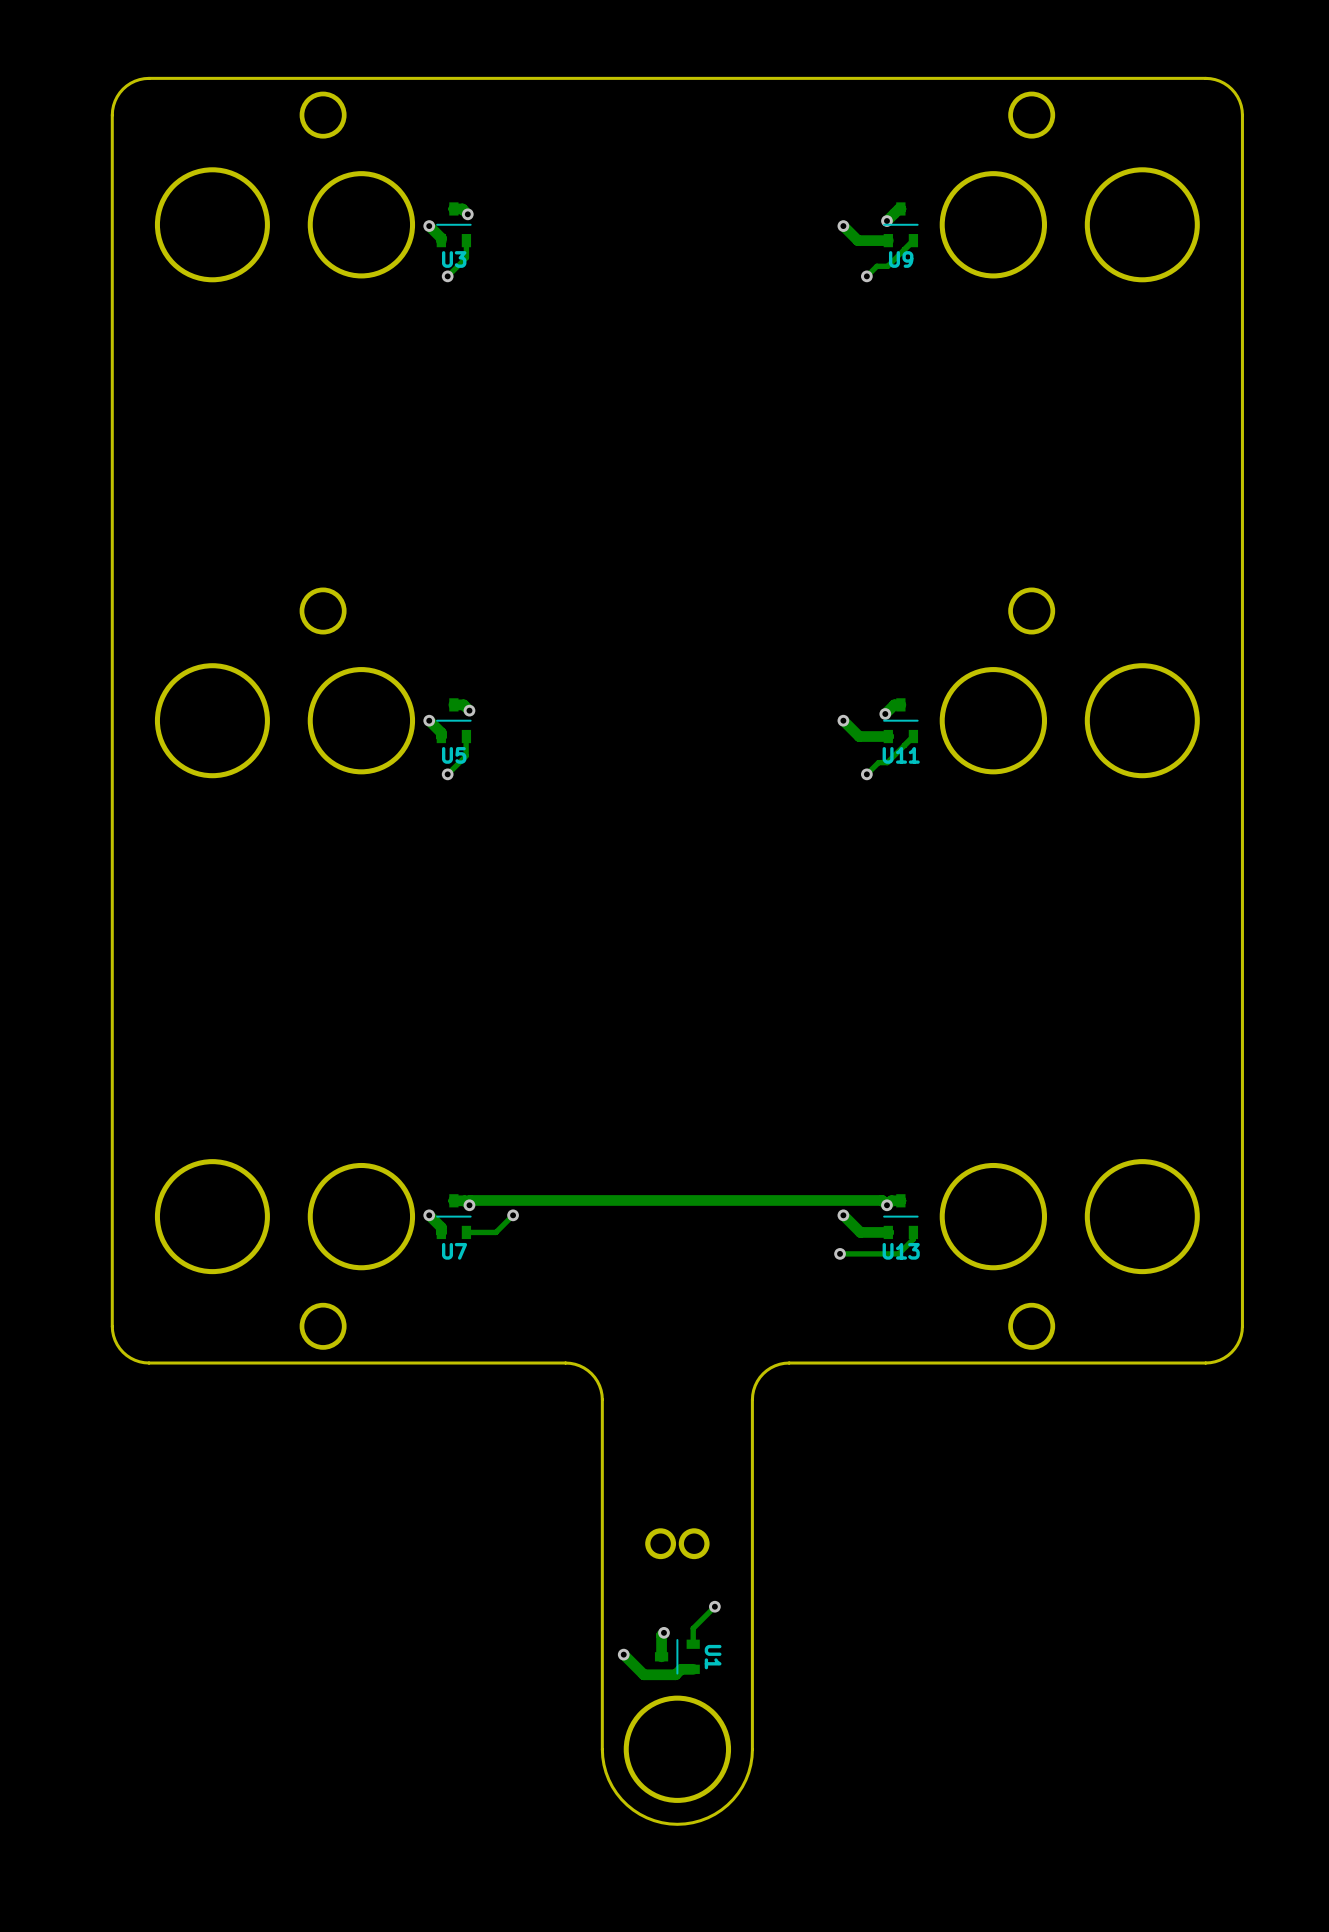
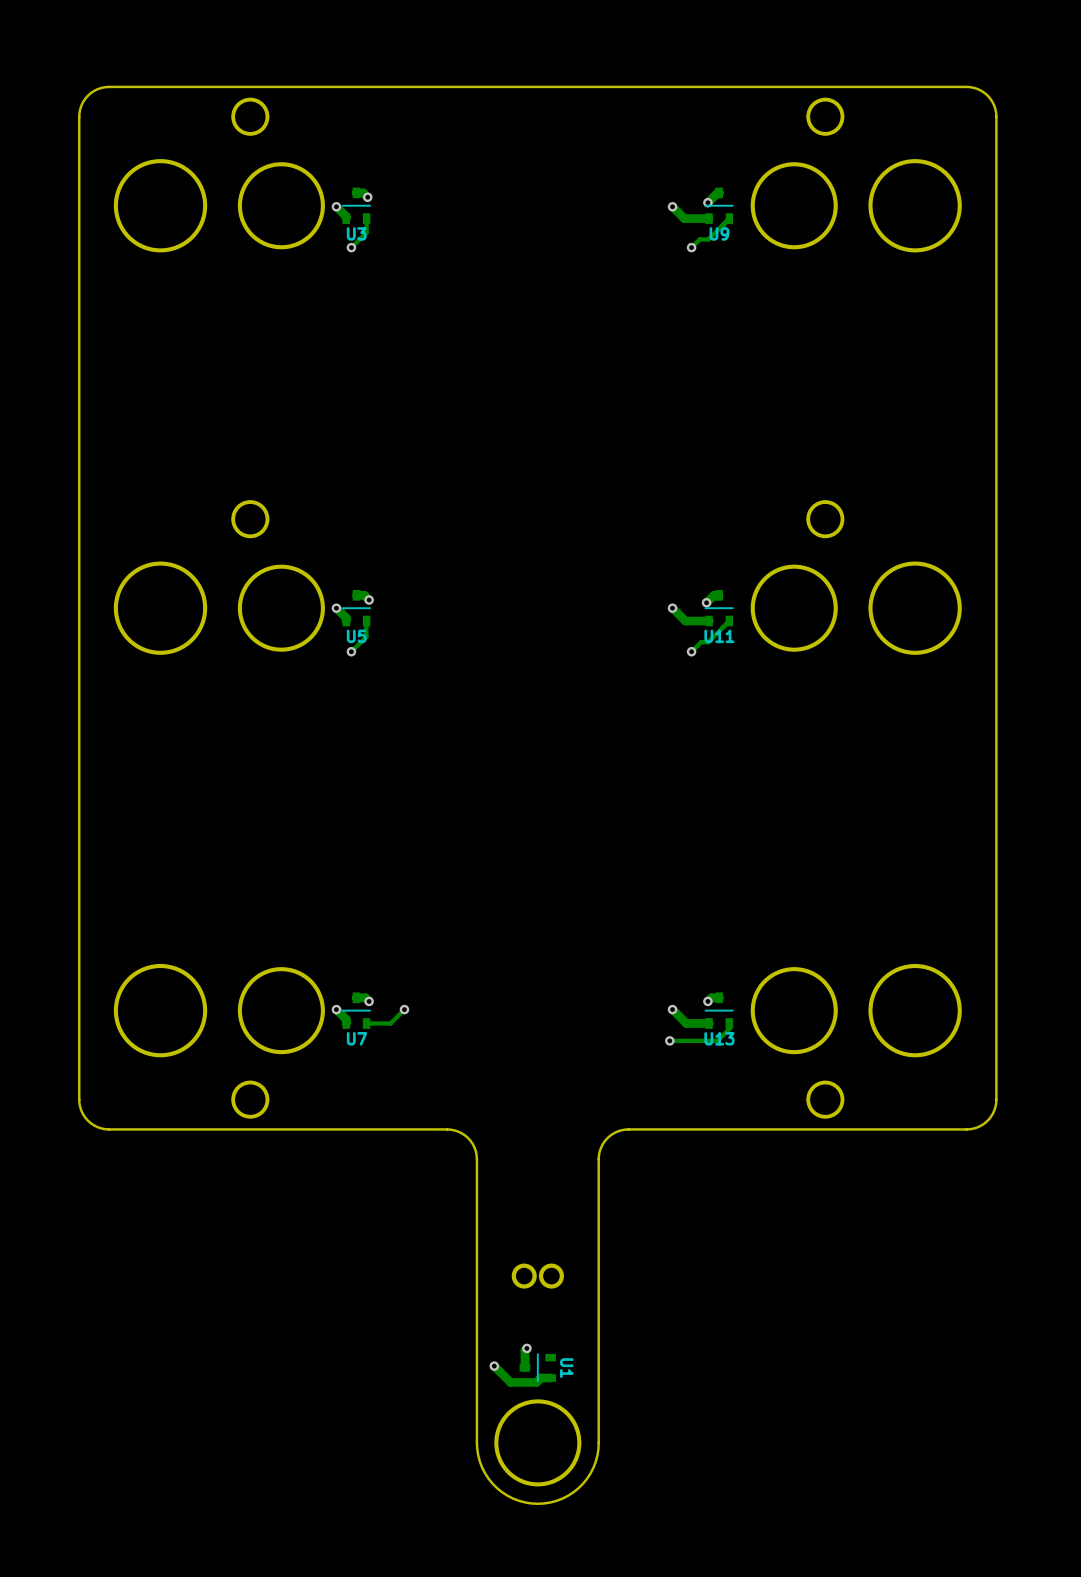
track: (467, 1203) (469, 1200) (882, 1200) (886, 1205) -> none
track: (714, 1606) (693, 1628) (693, 1644) -> none
via: (714, 1606) -> none

